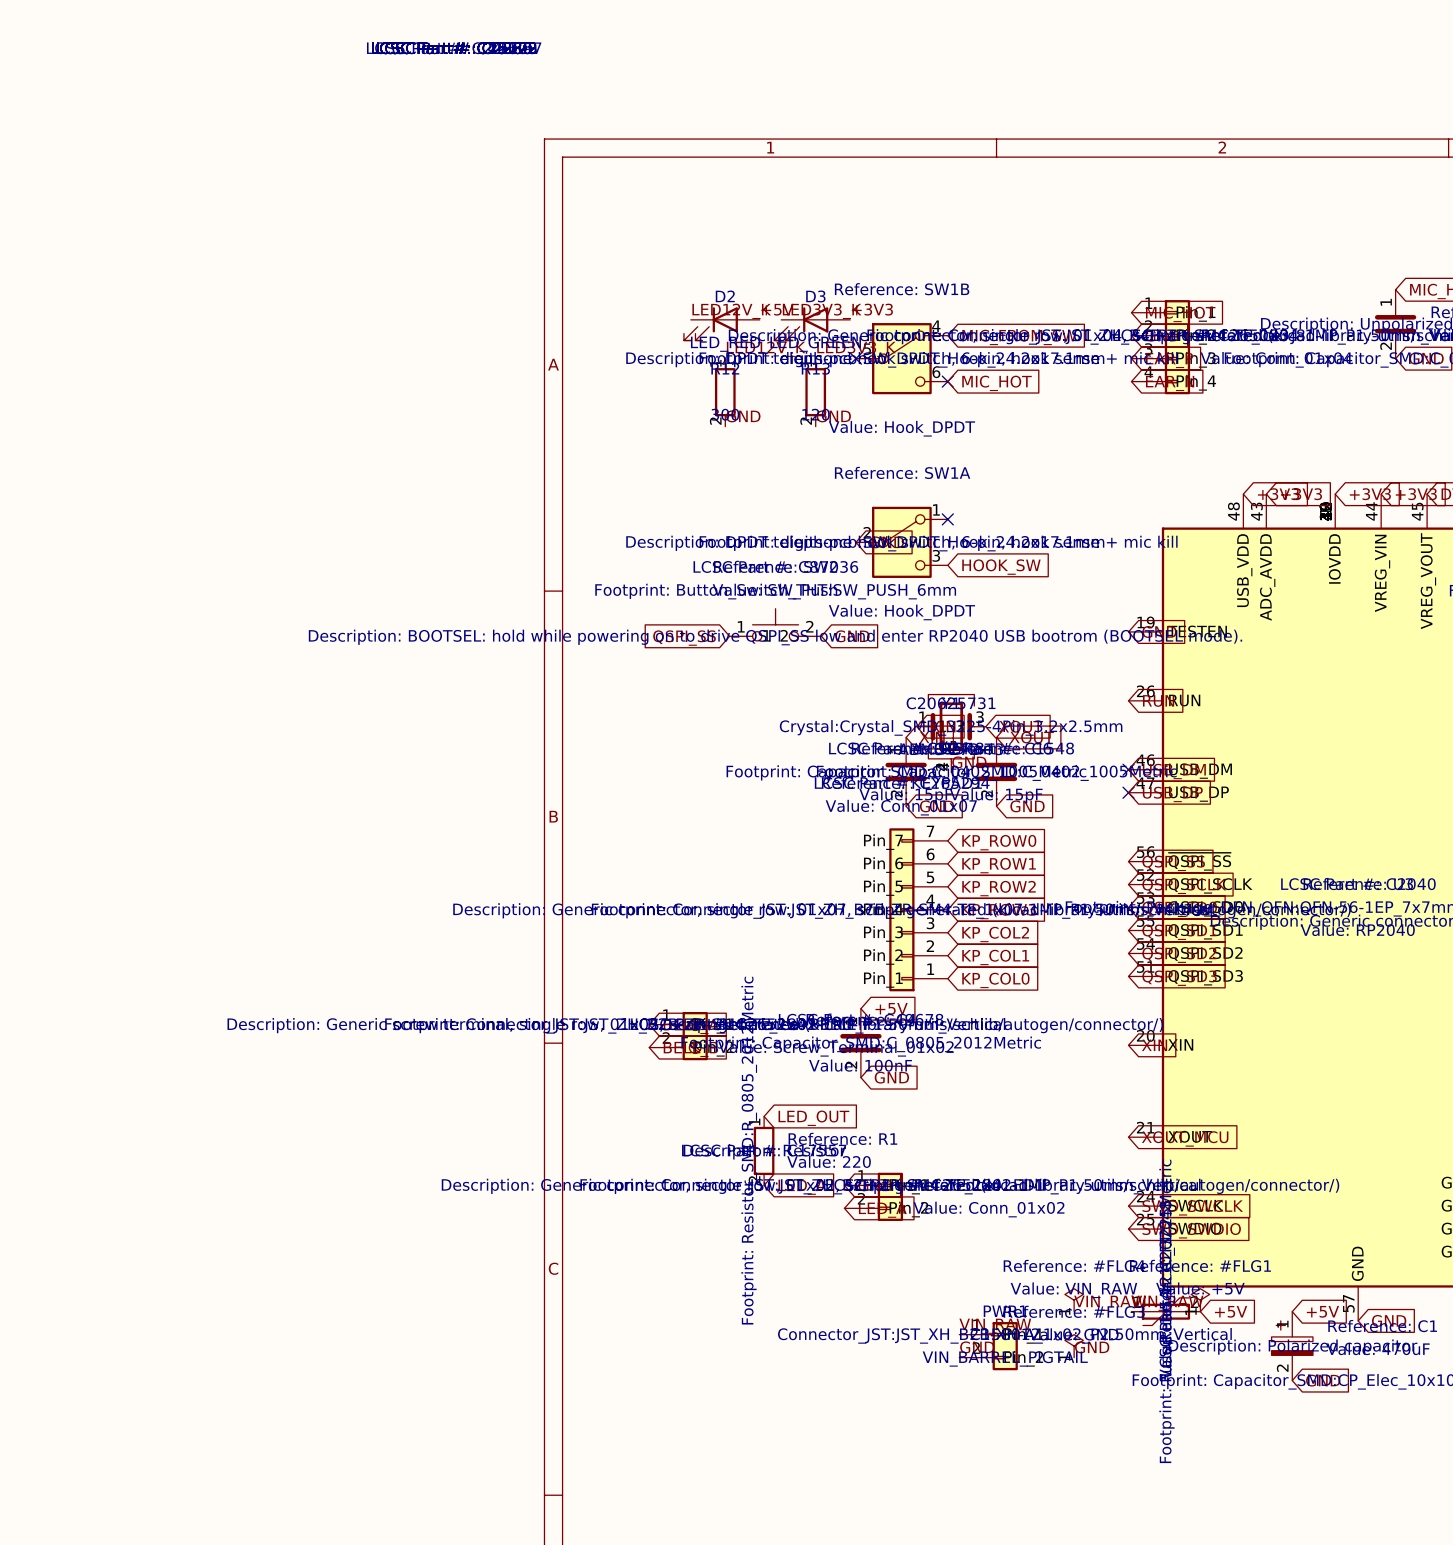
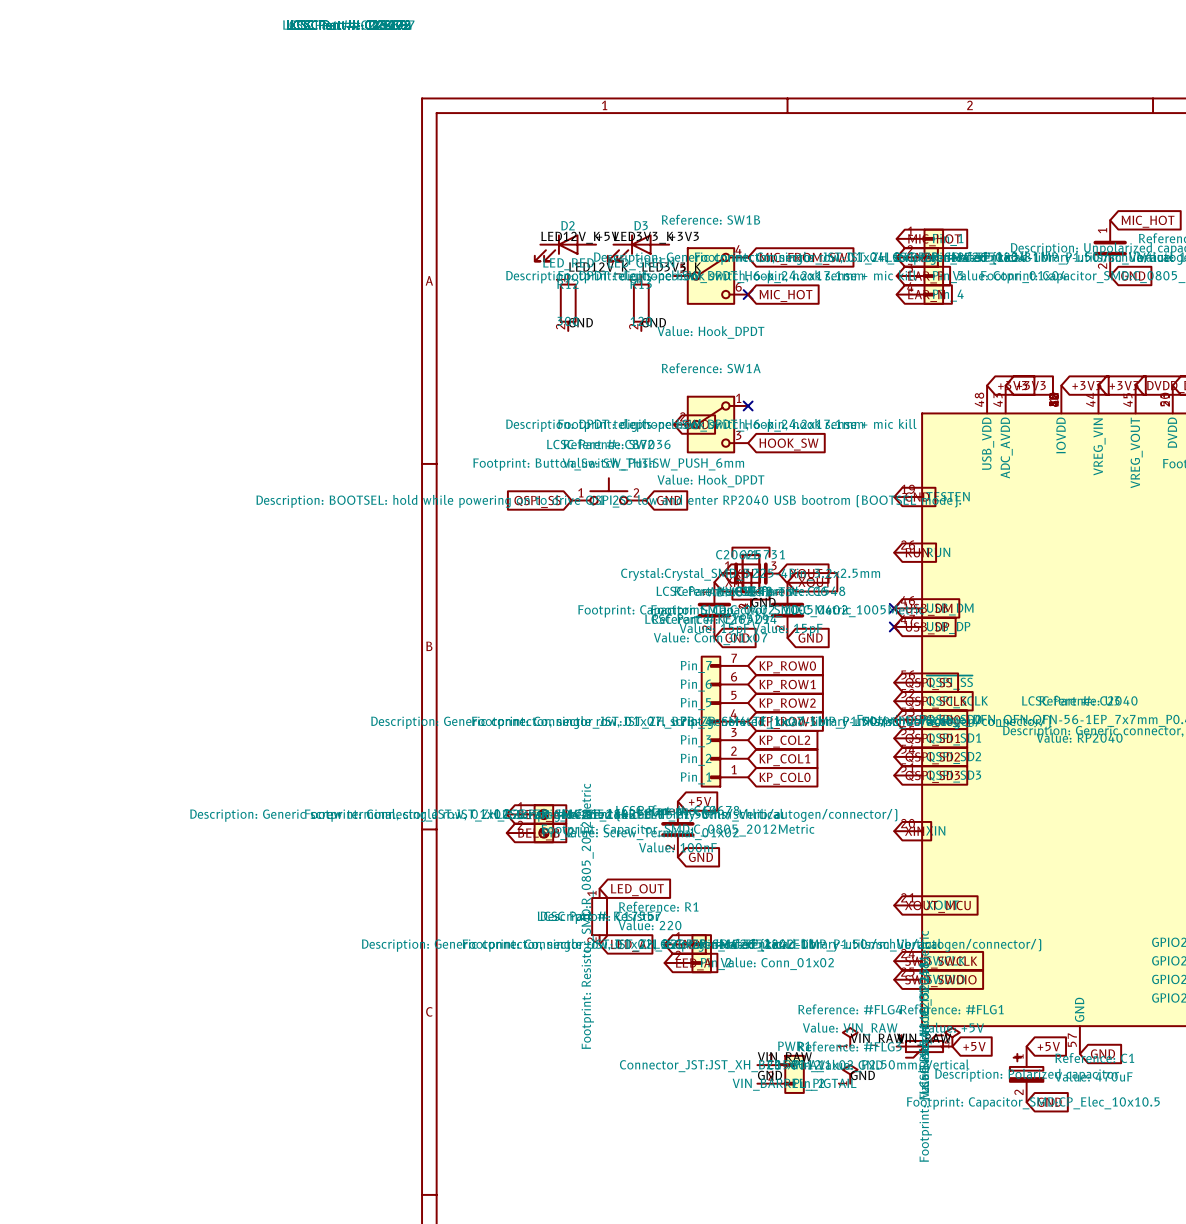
no-connect mark: (855, 358) -> none

